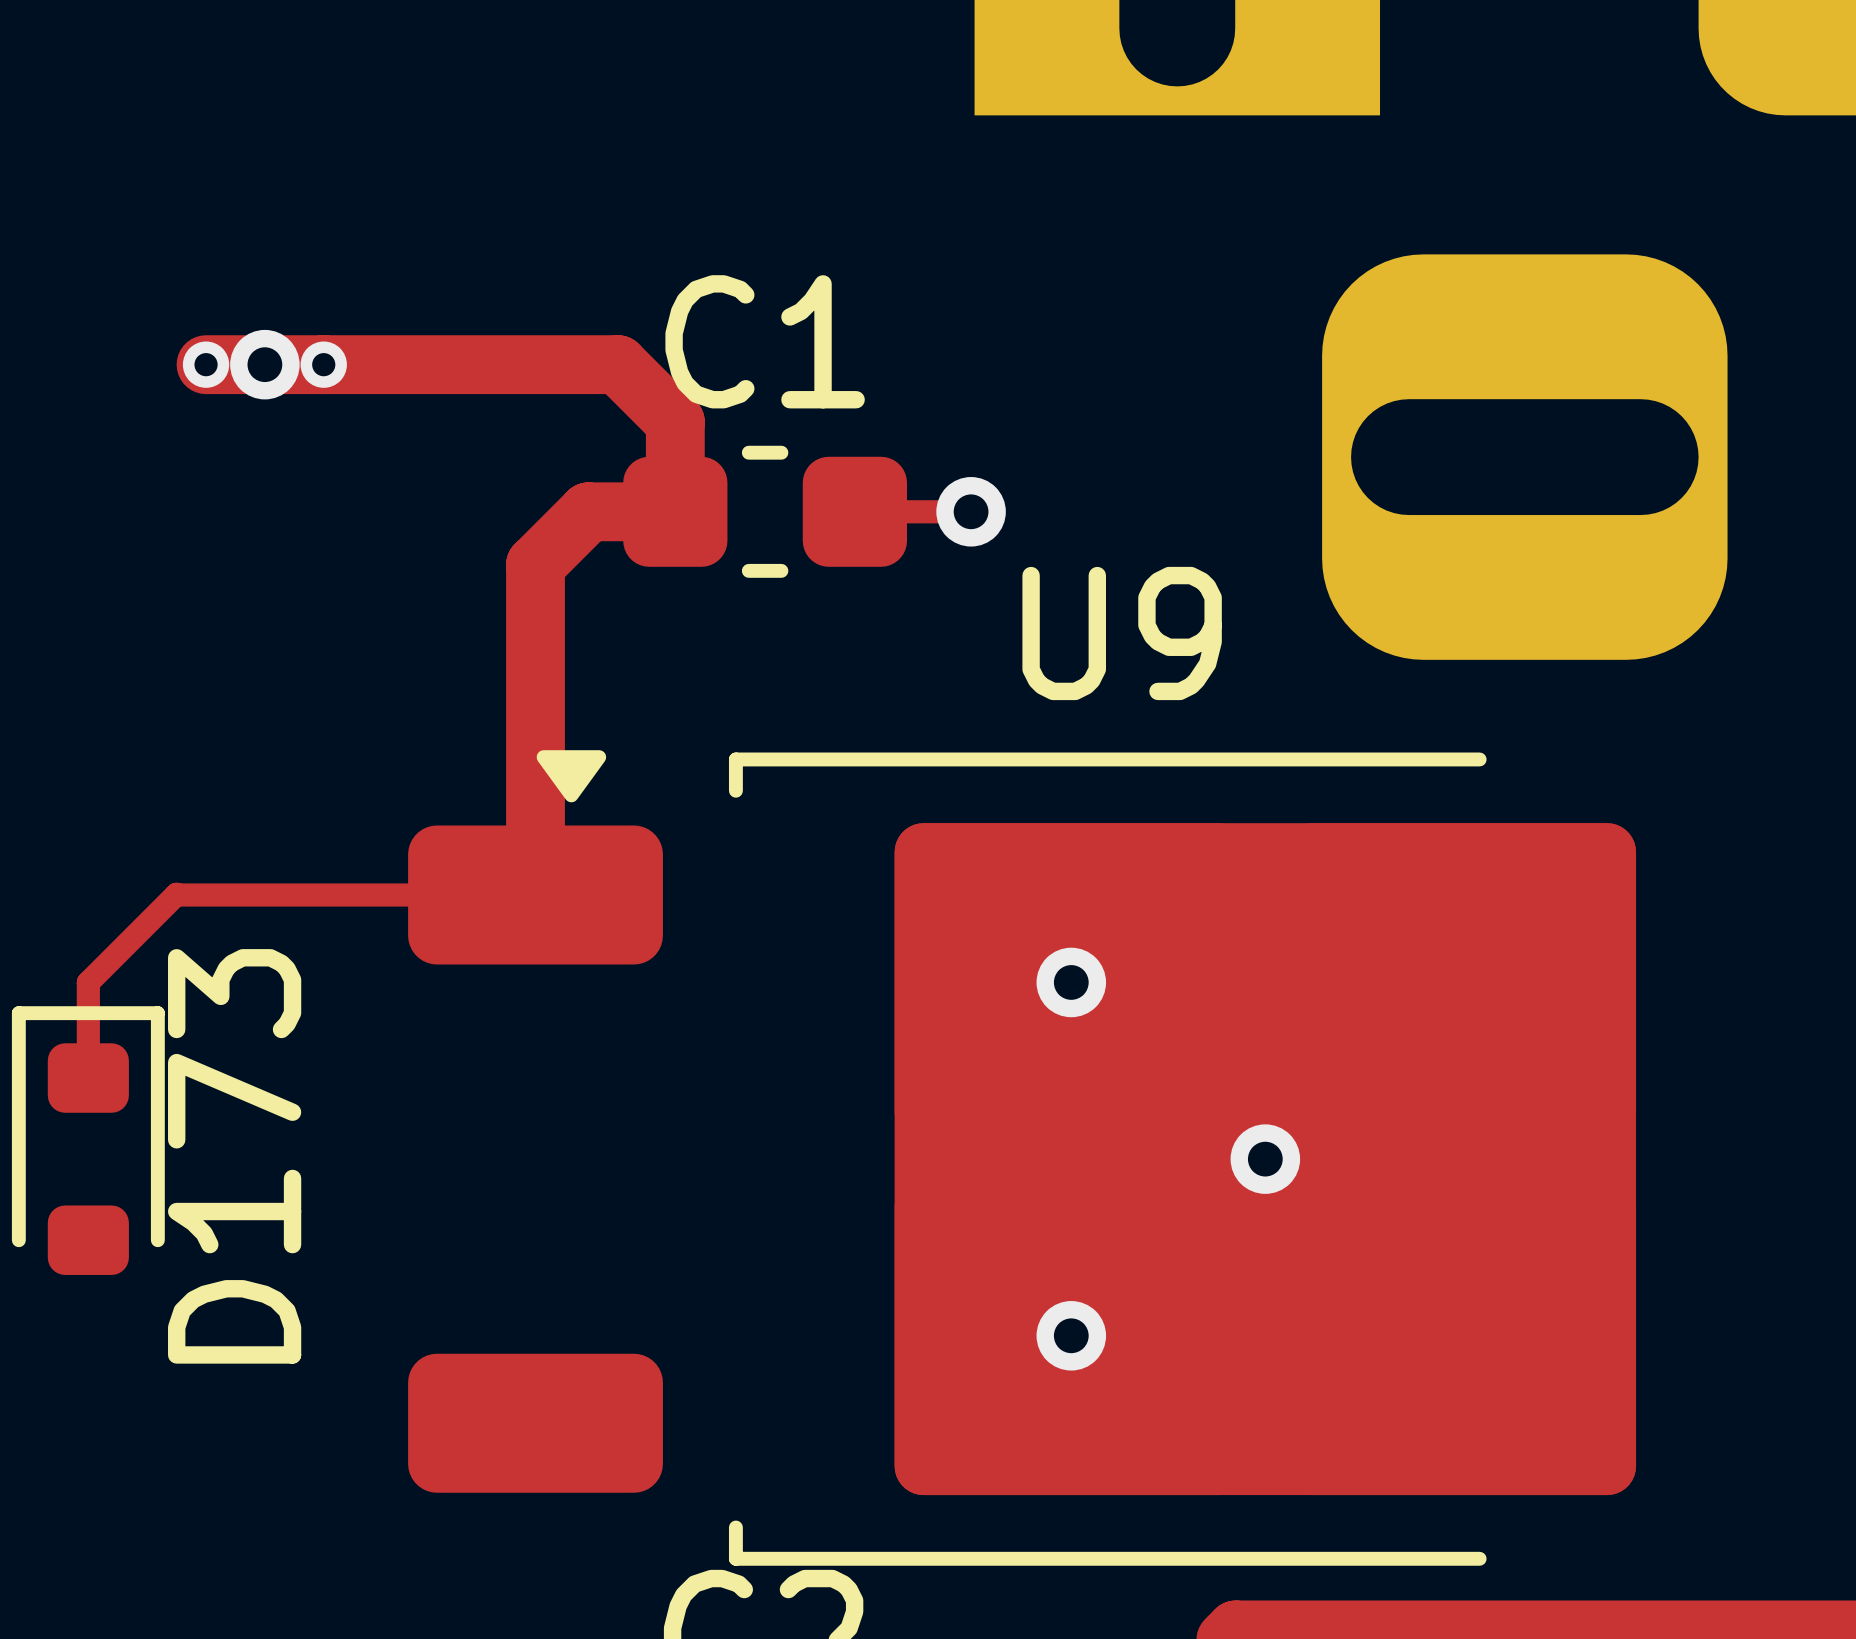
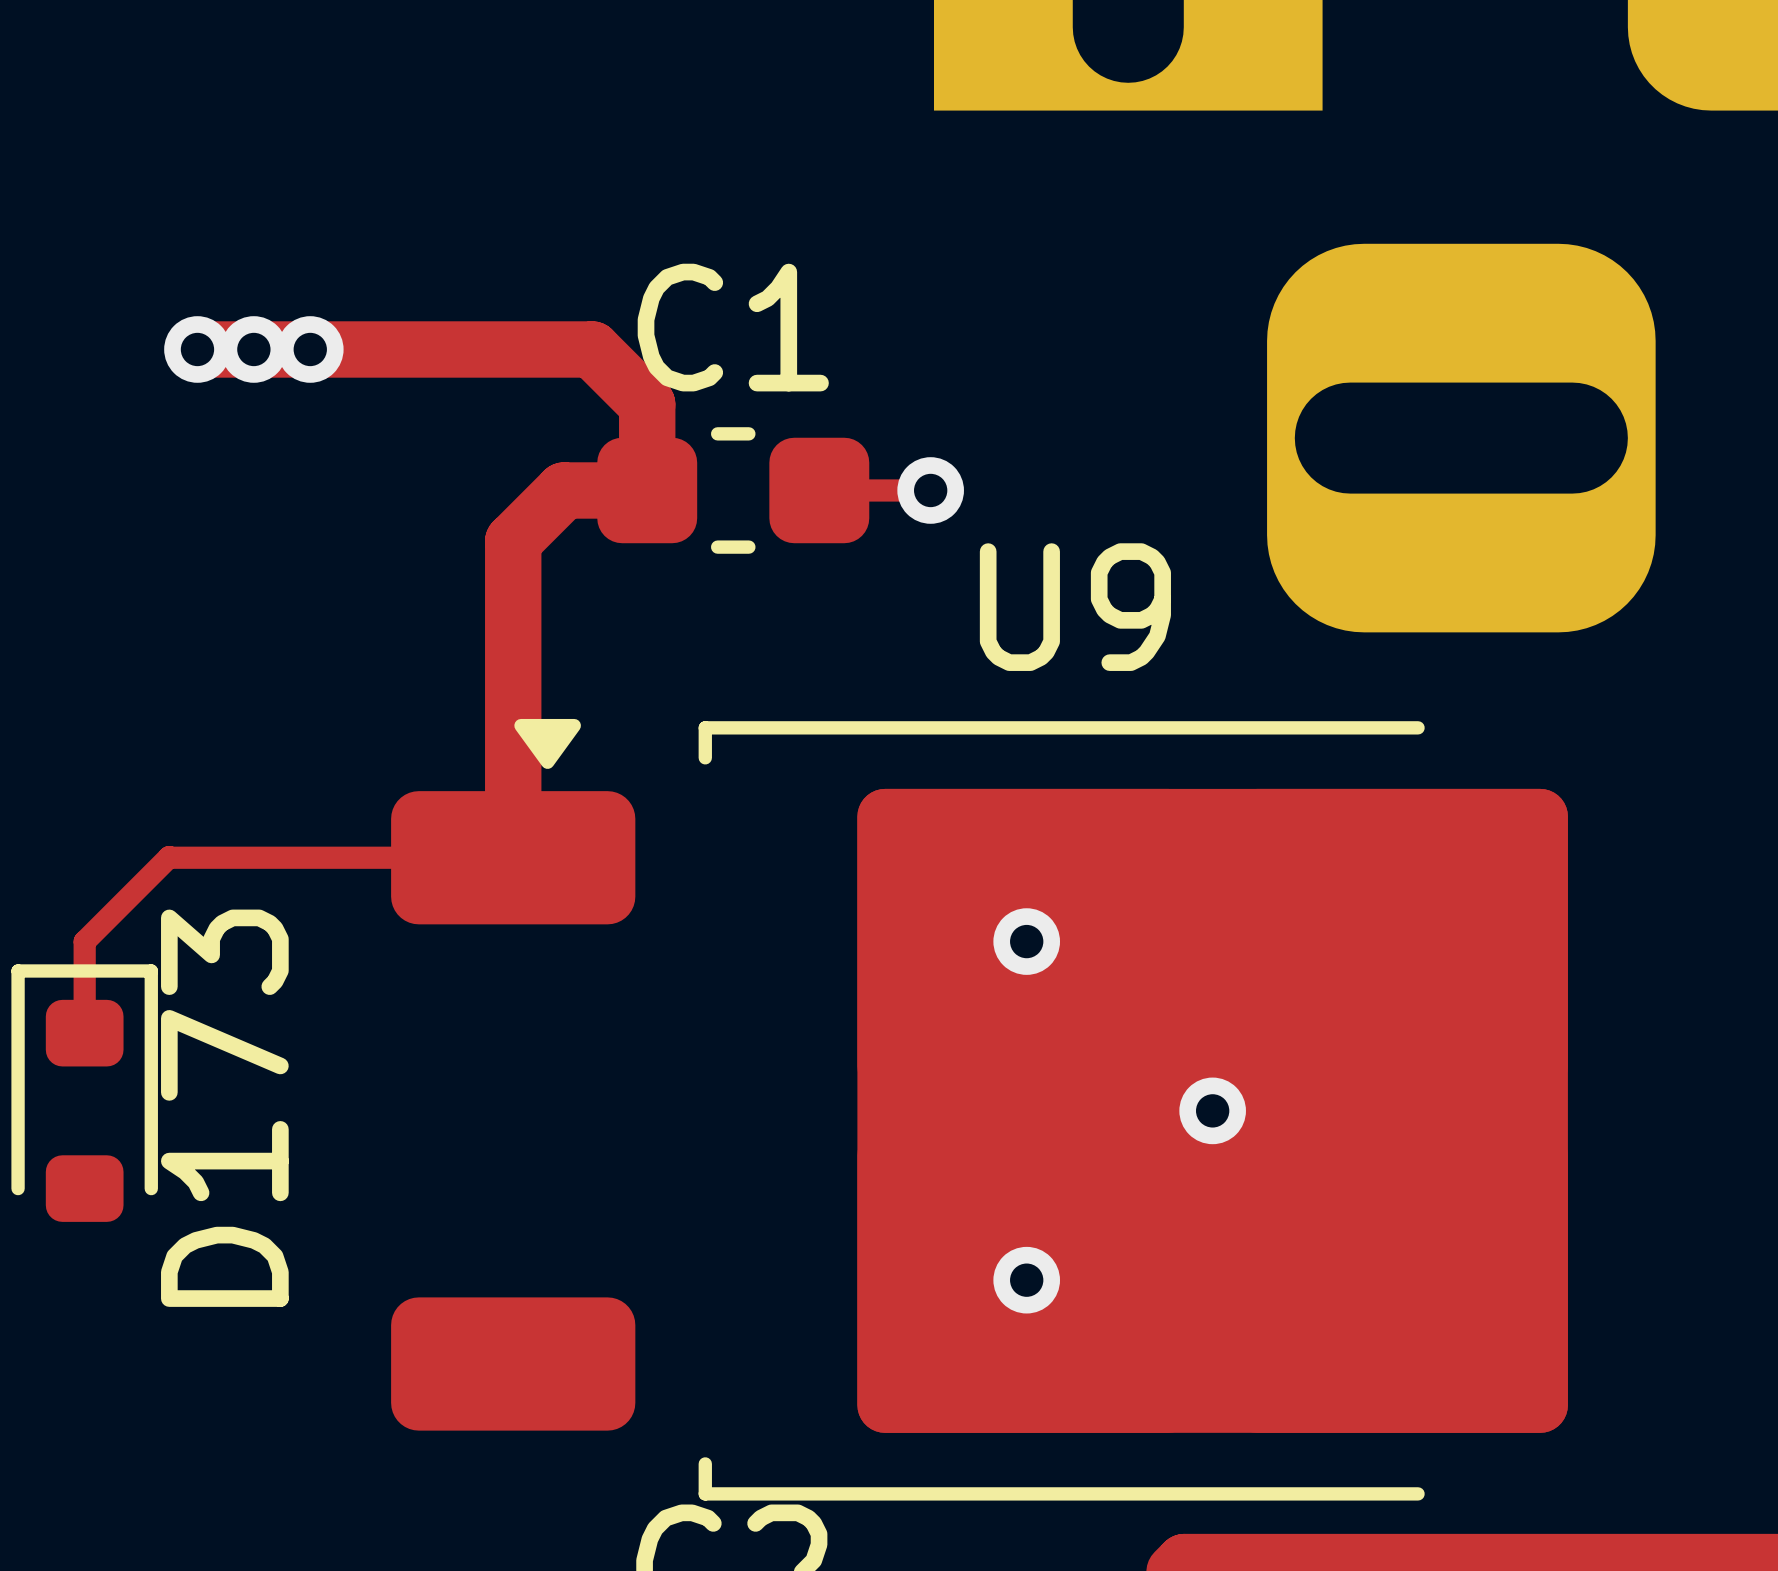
via size: [182, 341, 230, 388] -> [164, 316, 231, 383]
via size: [300, 341, 347, 388] -> [276, 316, 344, 383]

